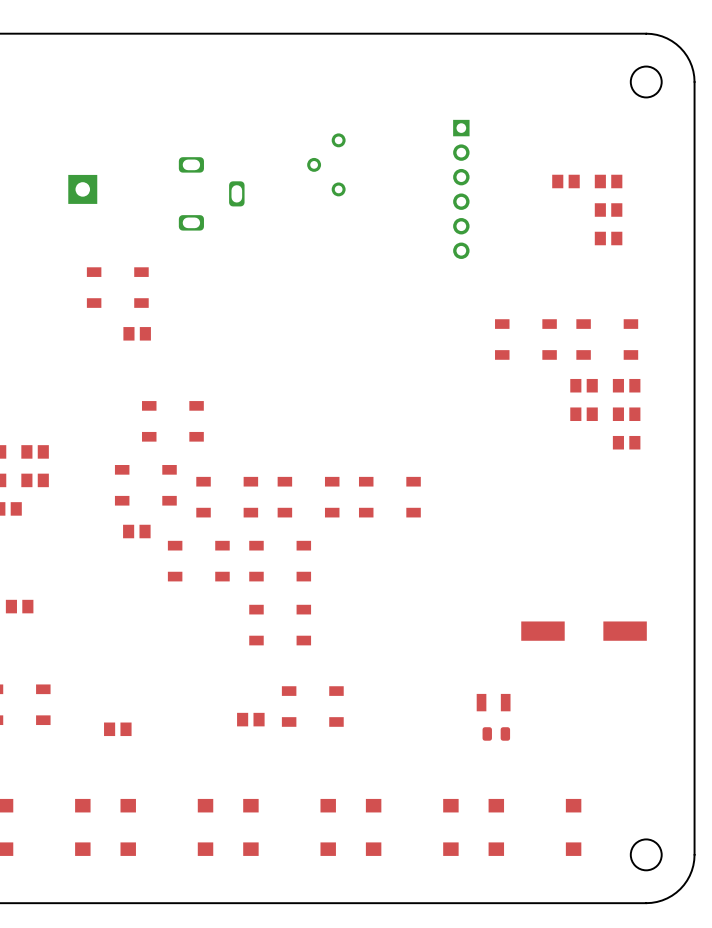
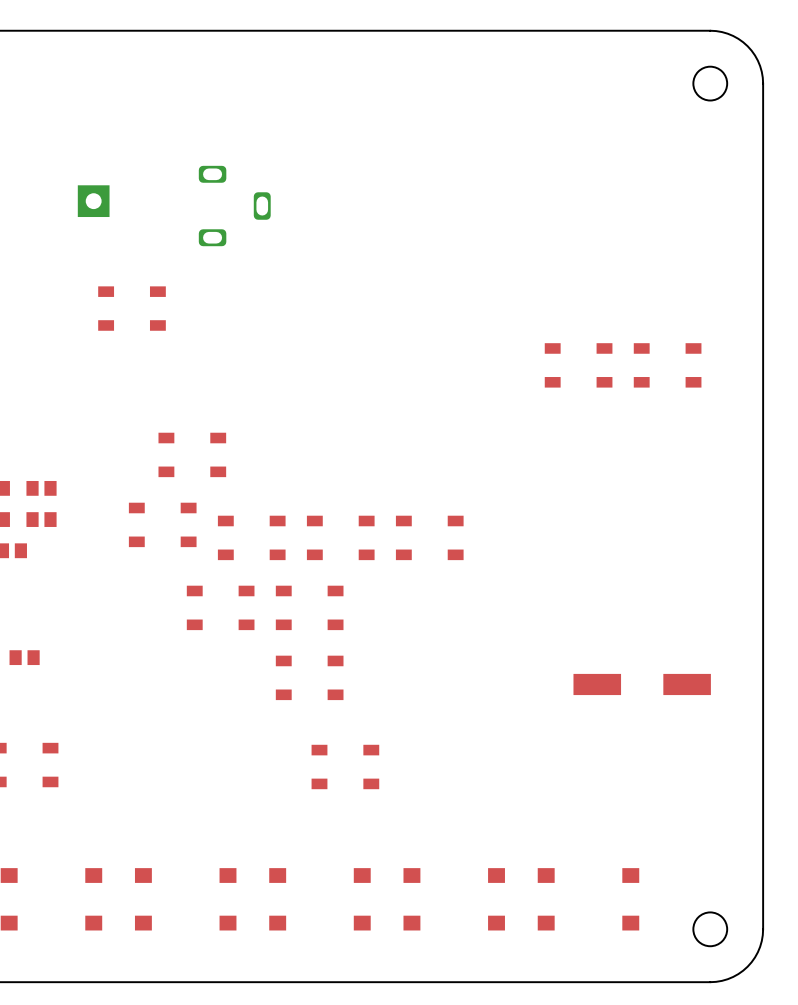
part: (326, 164) -> none
part: (565, 181) -> none
part: (608, 181) -> none
part: (461, 189) -> none
part: (608, 210) -> none
part: (608, 238) -> none
part: (137, 333) -> none
part: (584, 385) -> none
part: (626, 385) -> none
part: (584, 414) -> none
part: (626, 414) -> none
part: (626, 442) -> none
part: (136, 531) -> none
part: (493, 702) -> none
part: (250, 719) -> none
part: (117, 729) -> none
part: (496, 733) -> none

